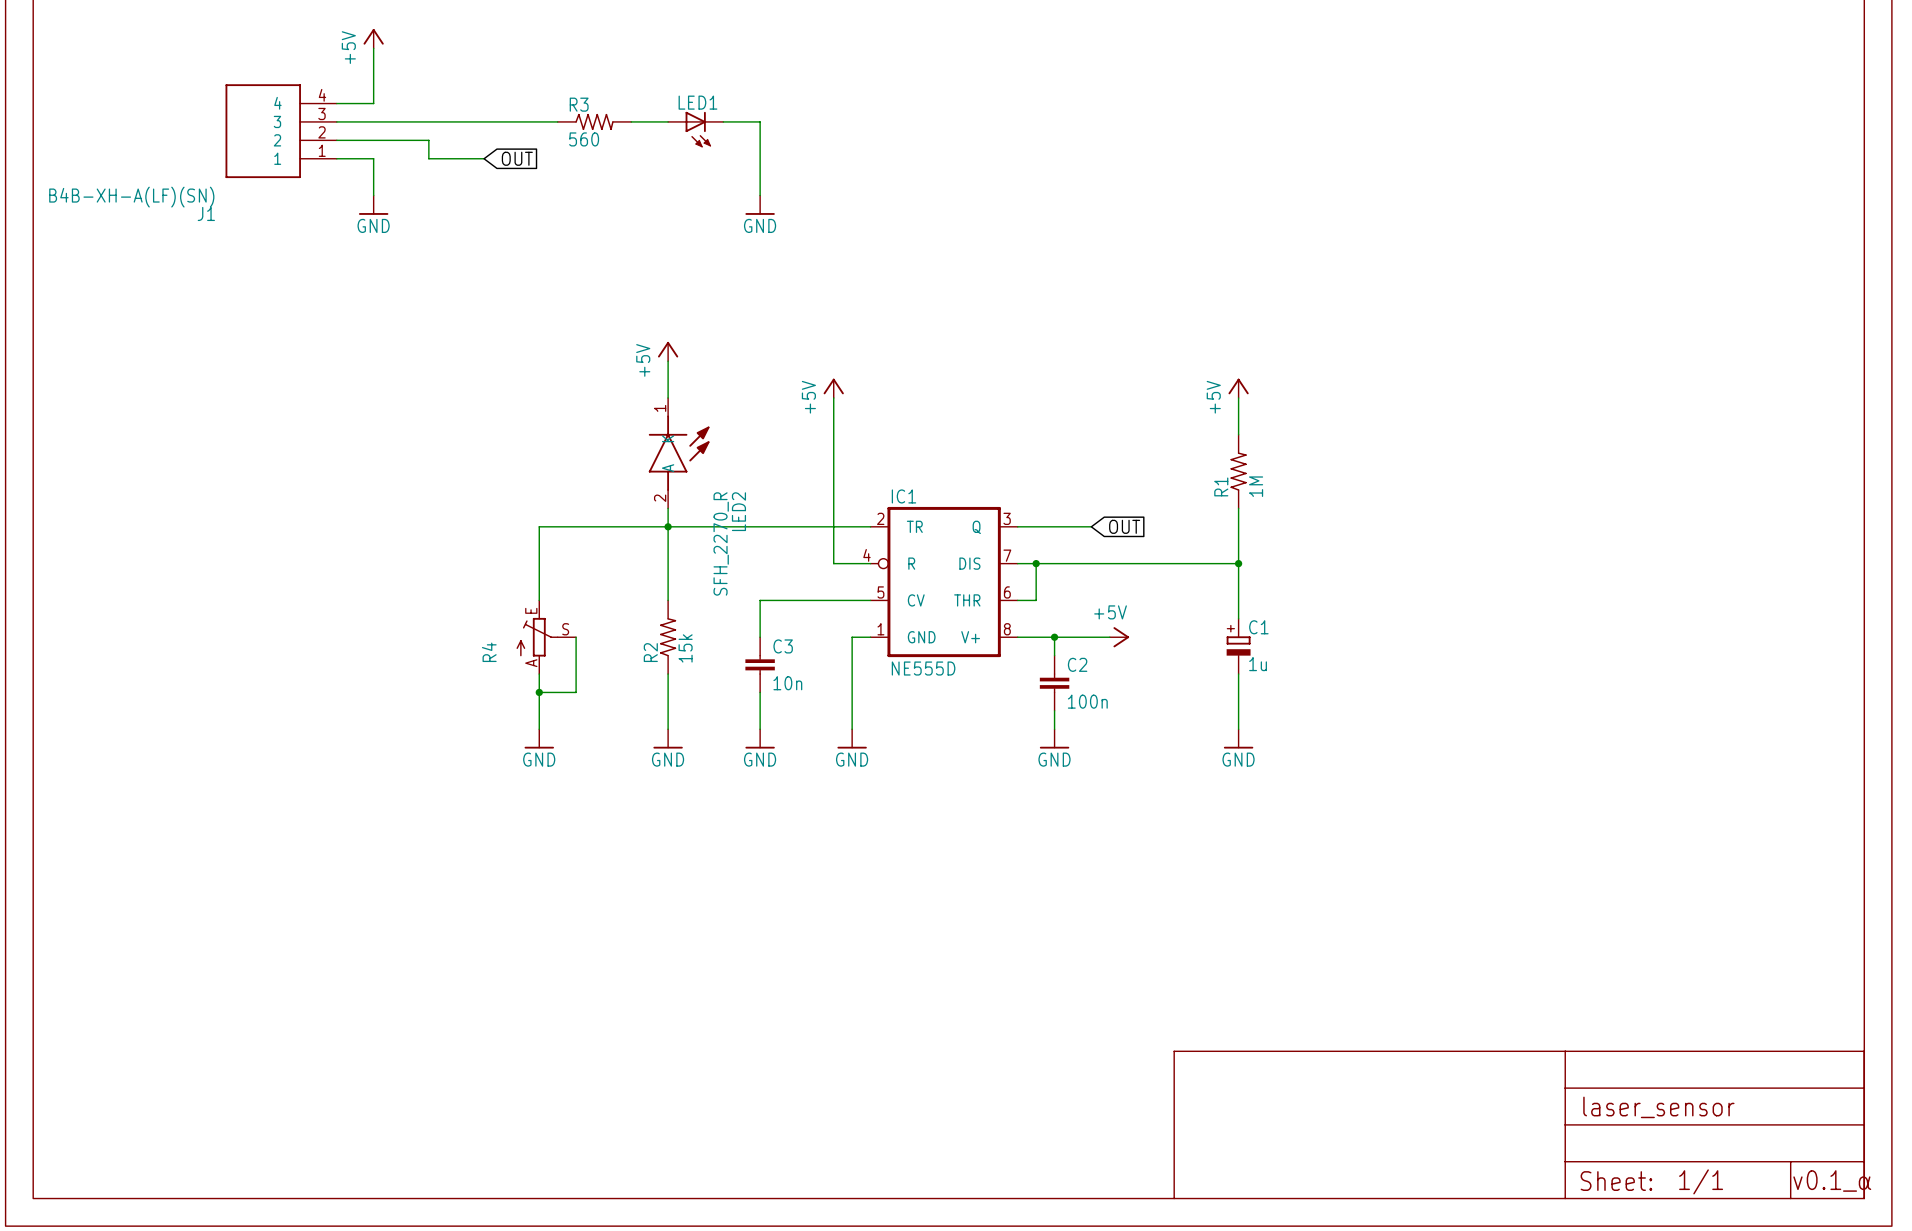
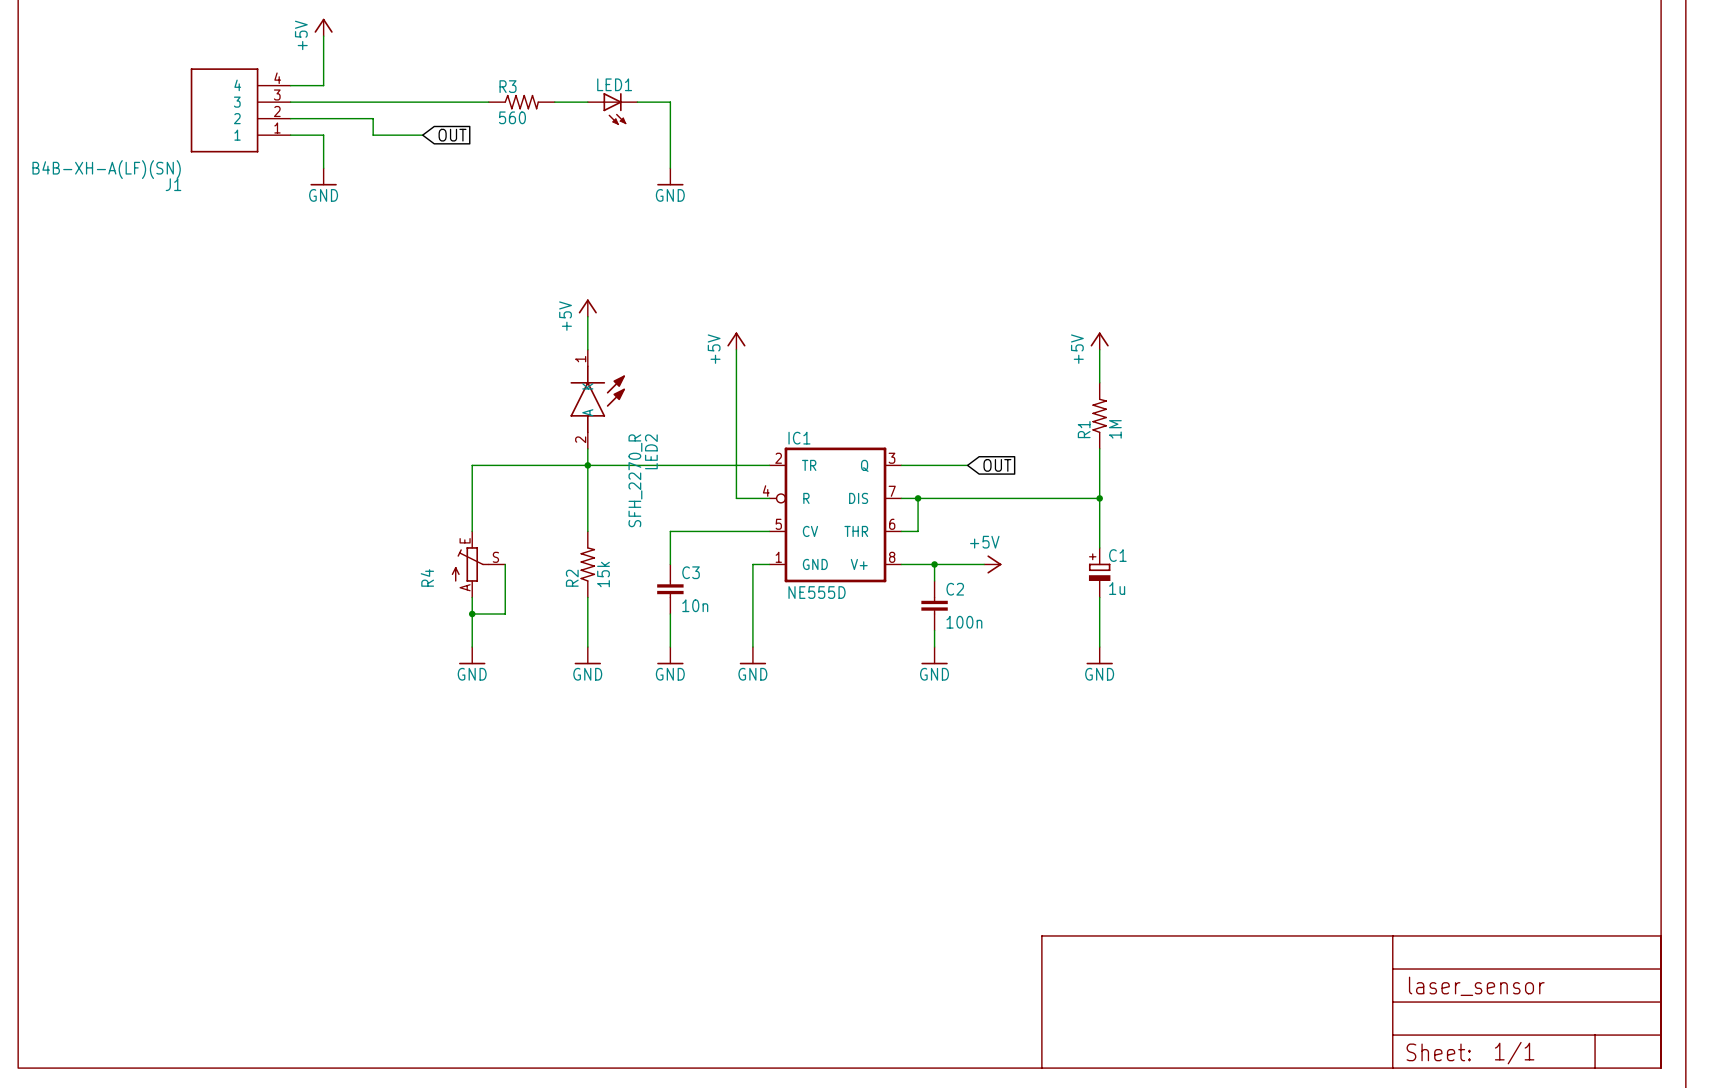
text: v0.1_α (1832, 1181) -> none

